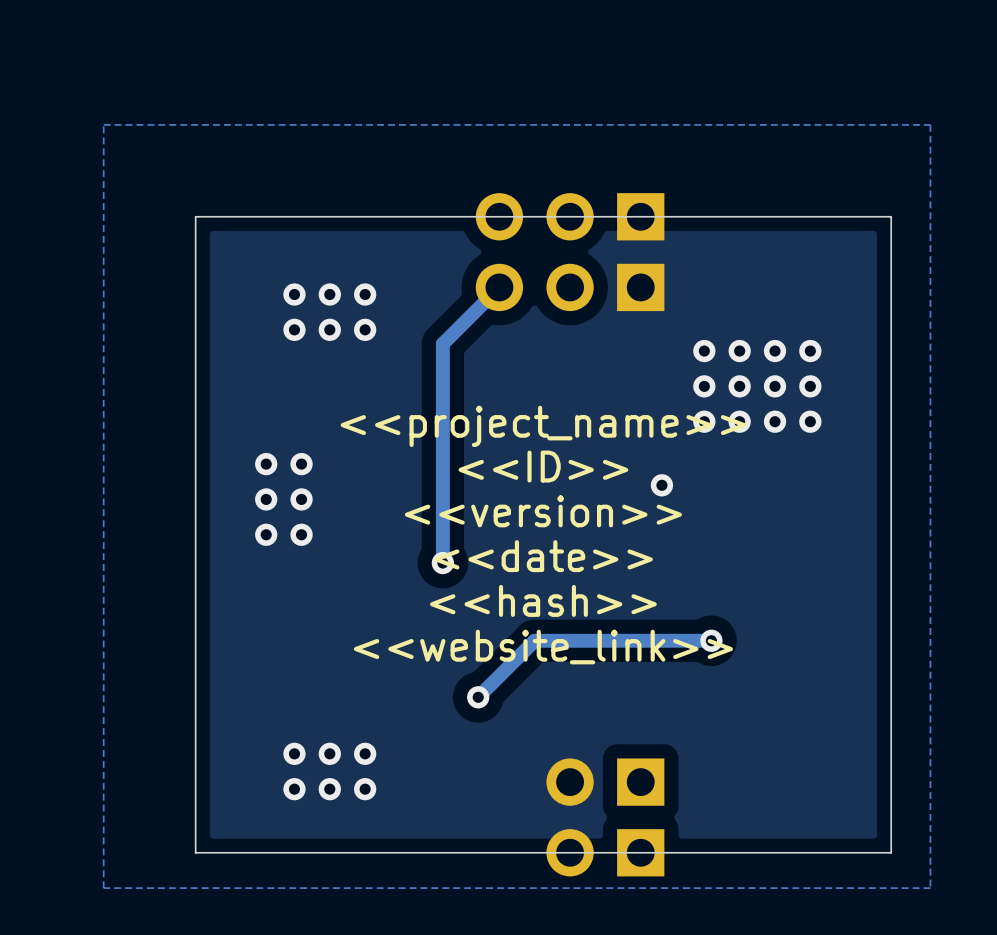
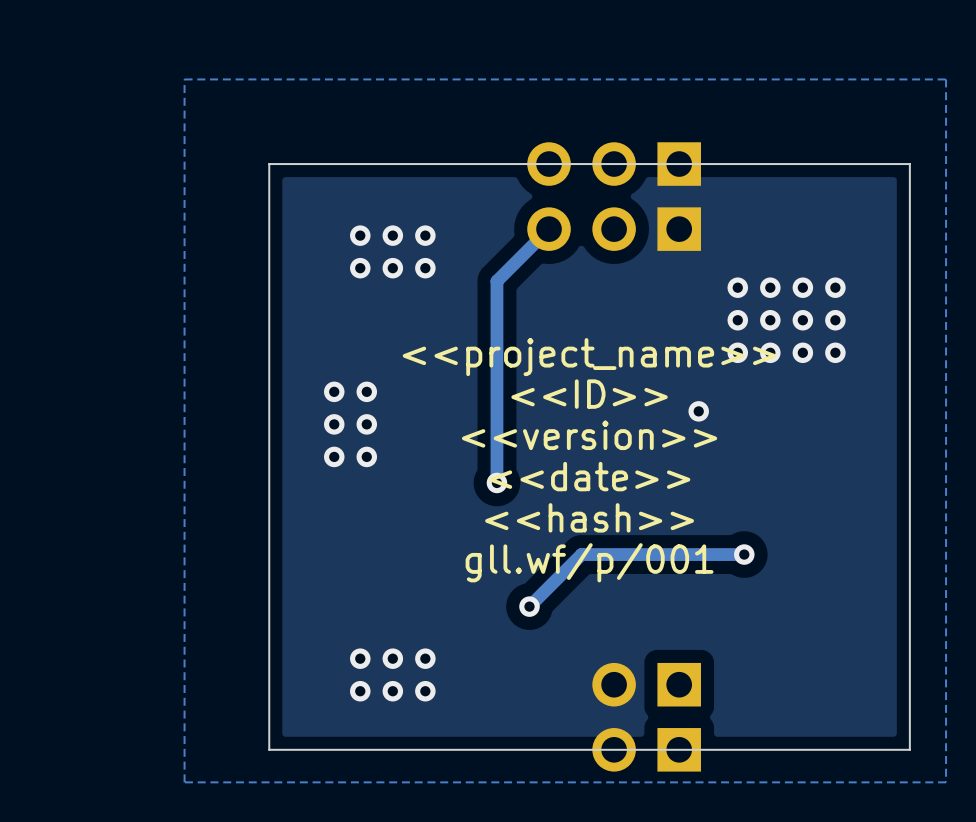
text: <<website_link>> (543, 647) -> gll.wf/p/001 (589, 562)

